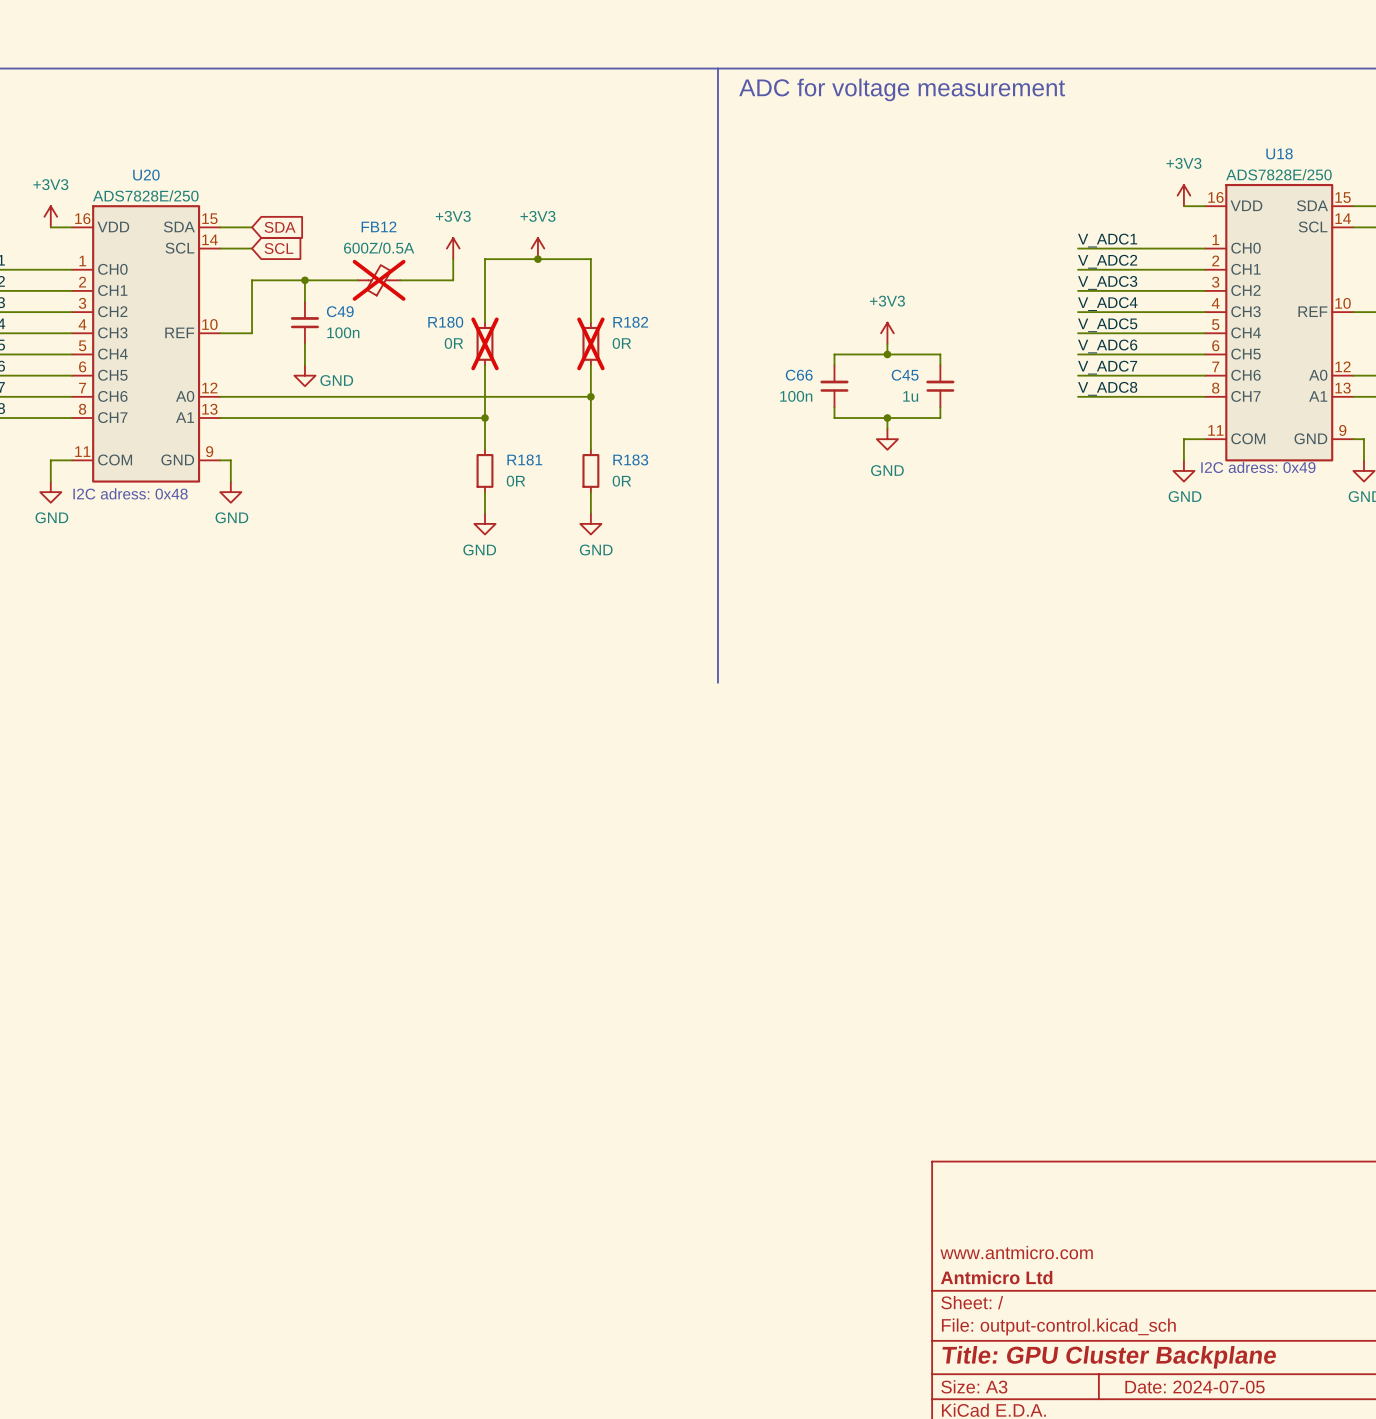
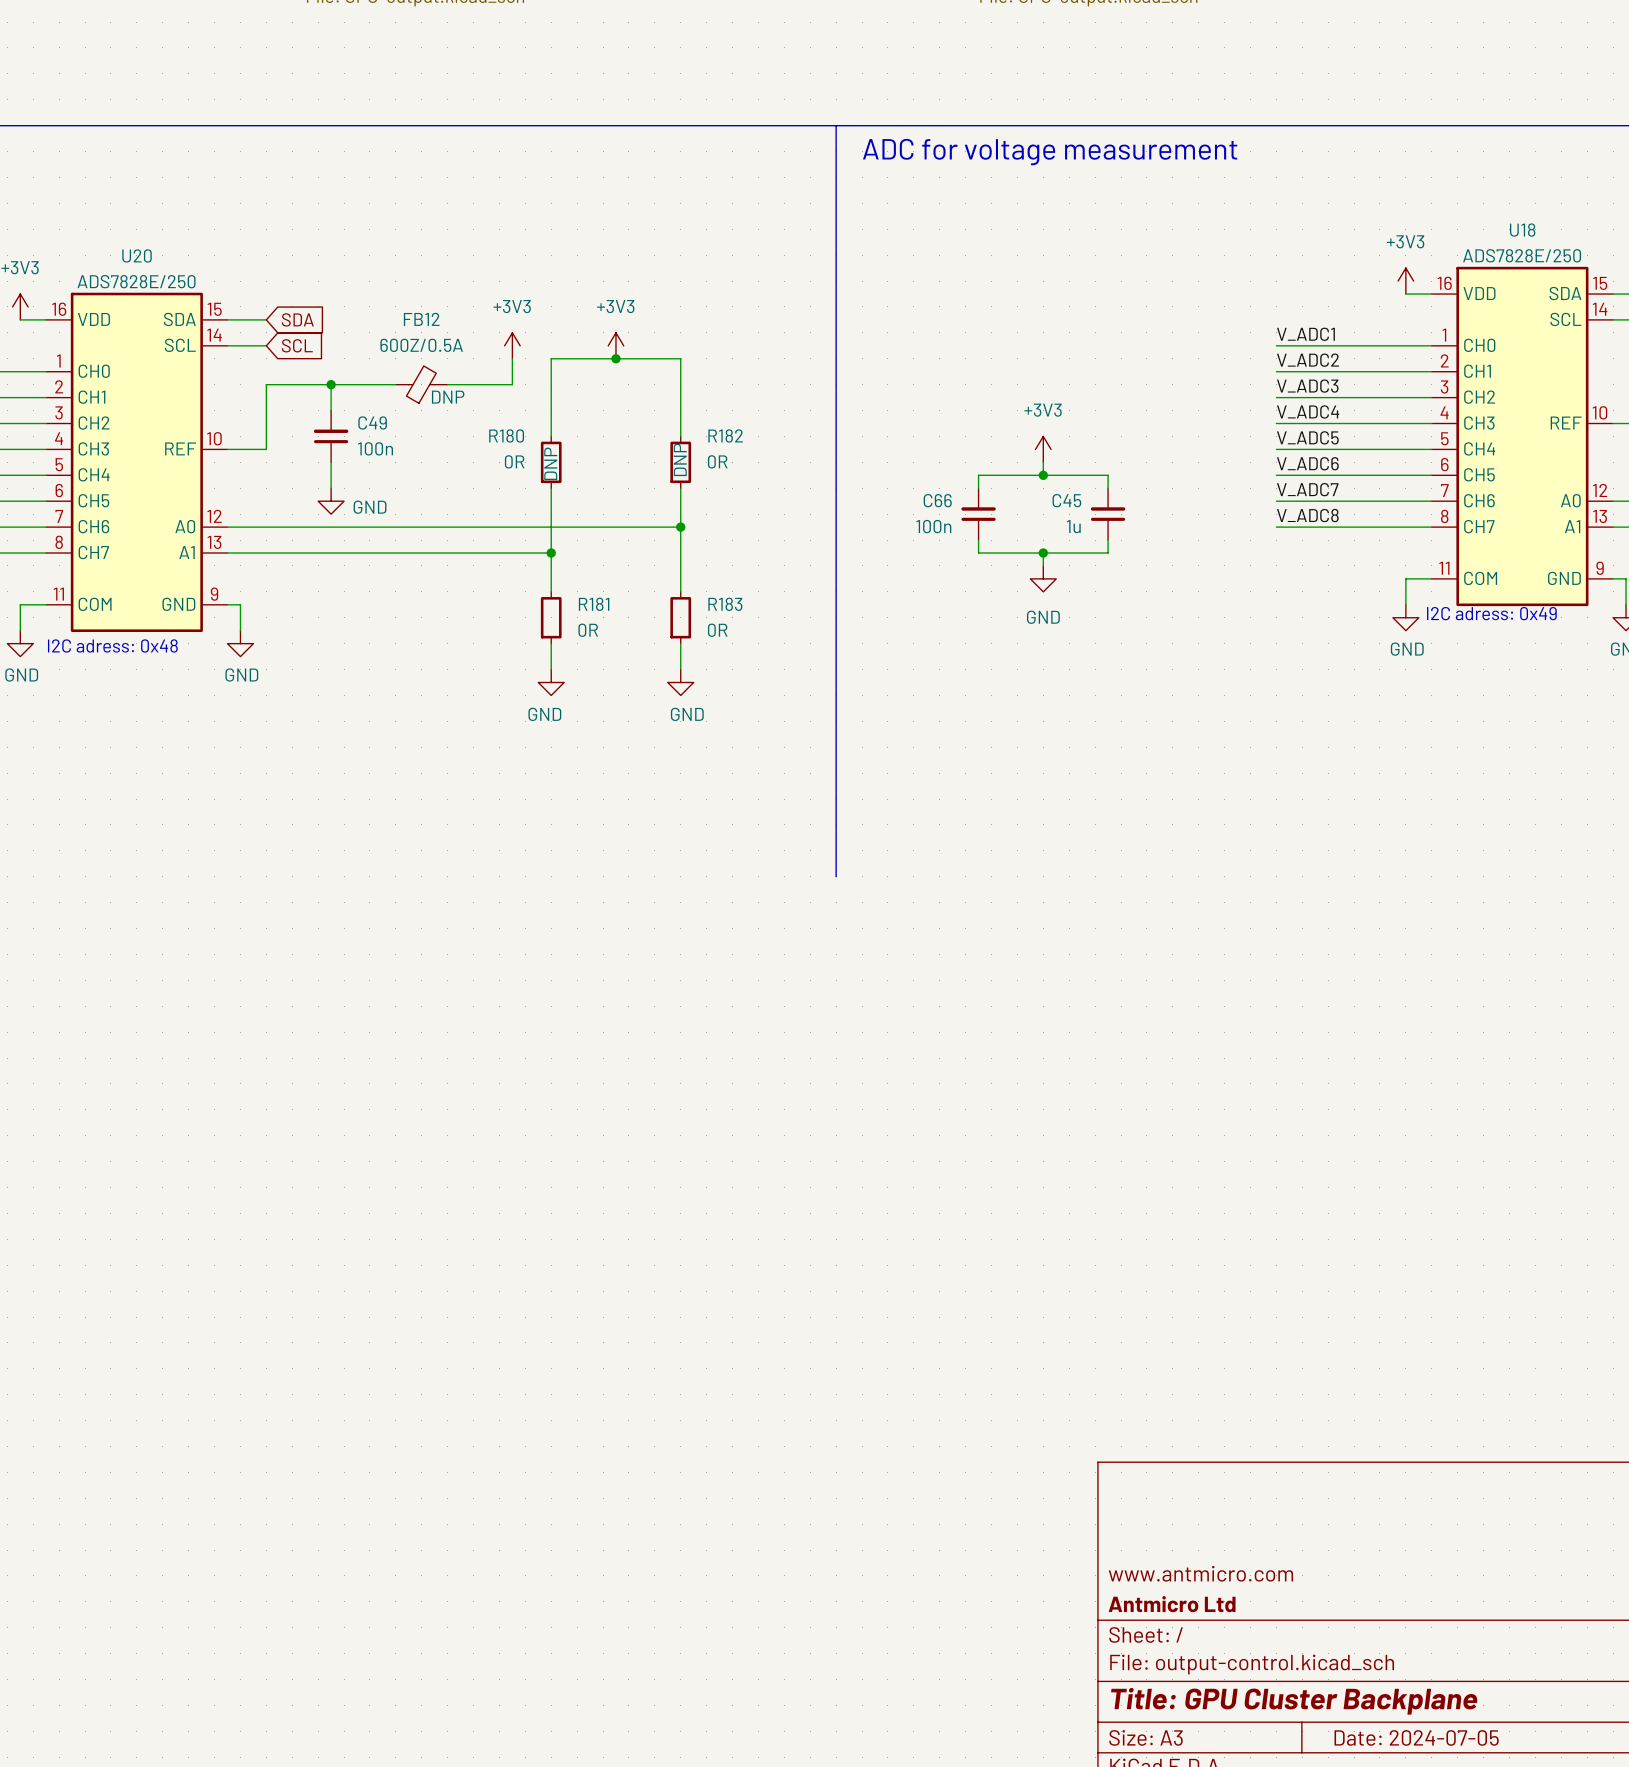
FB12 do-not-place cross: (379, 280) -> none
FB12 text: none -> DNP (448, 397)
R180 text: none -> DNP (550, 463)
R180 do-not-place cross: (485, 343) -> none
R182 do-not-place cross: (590, 343) -> none
R182 text: none -> DNP (680, 459)

